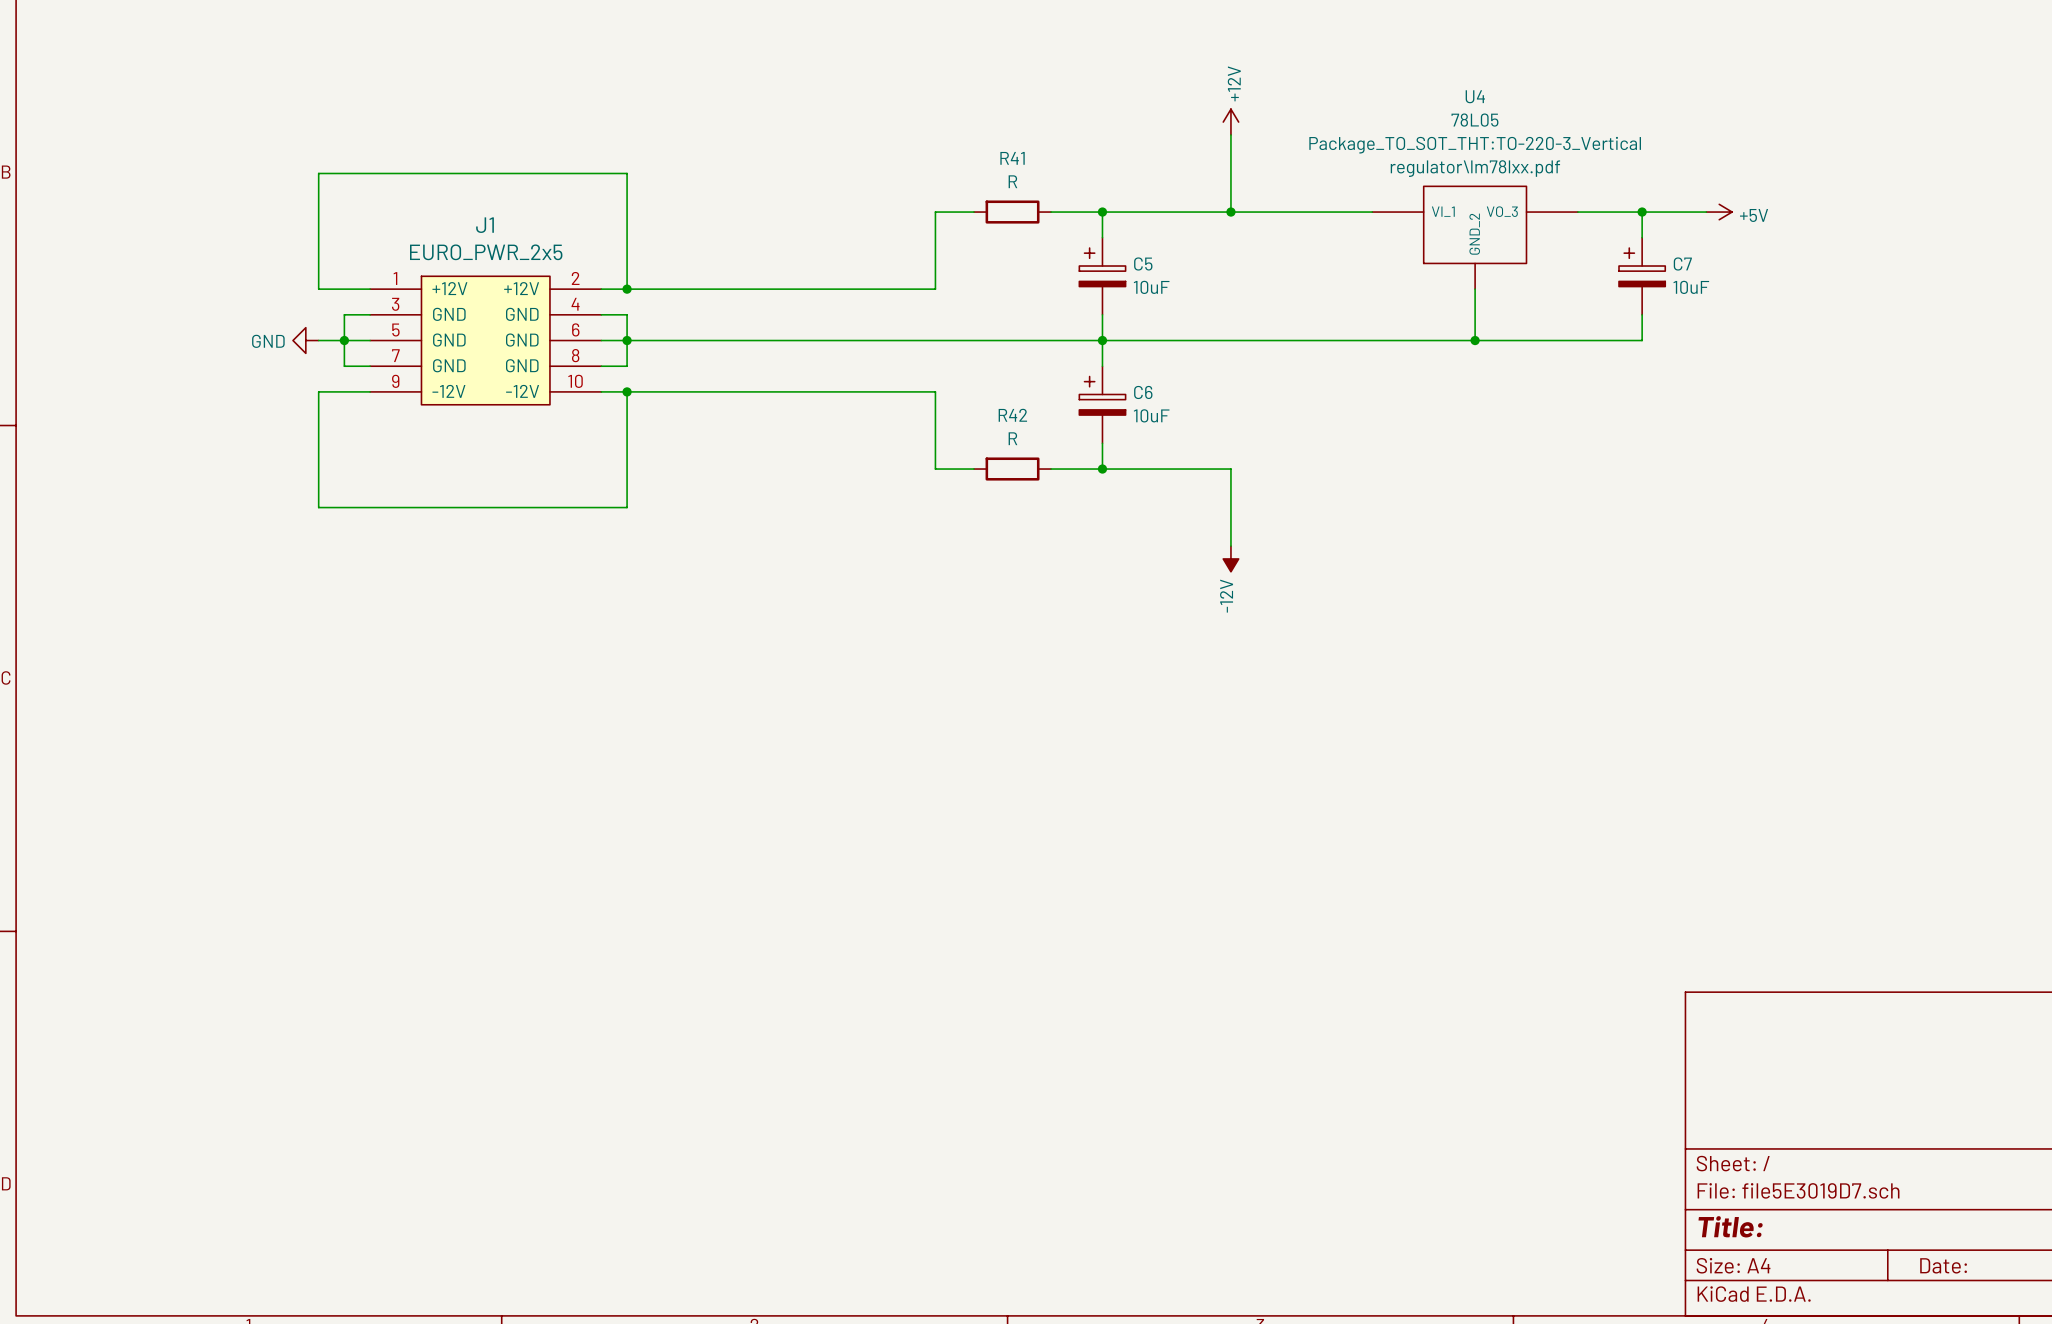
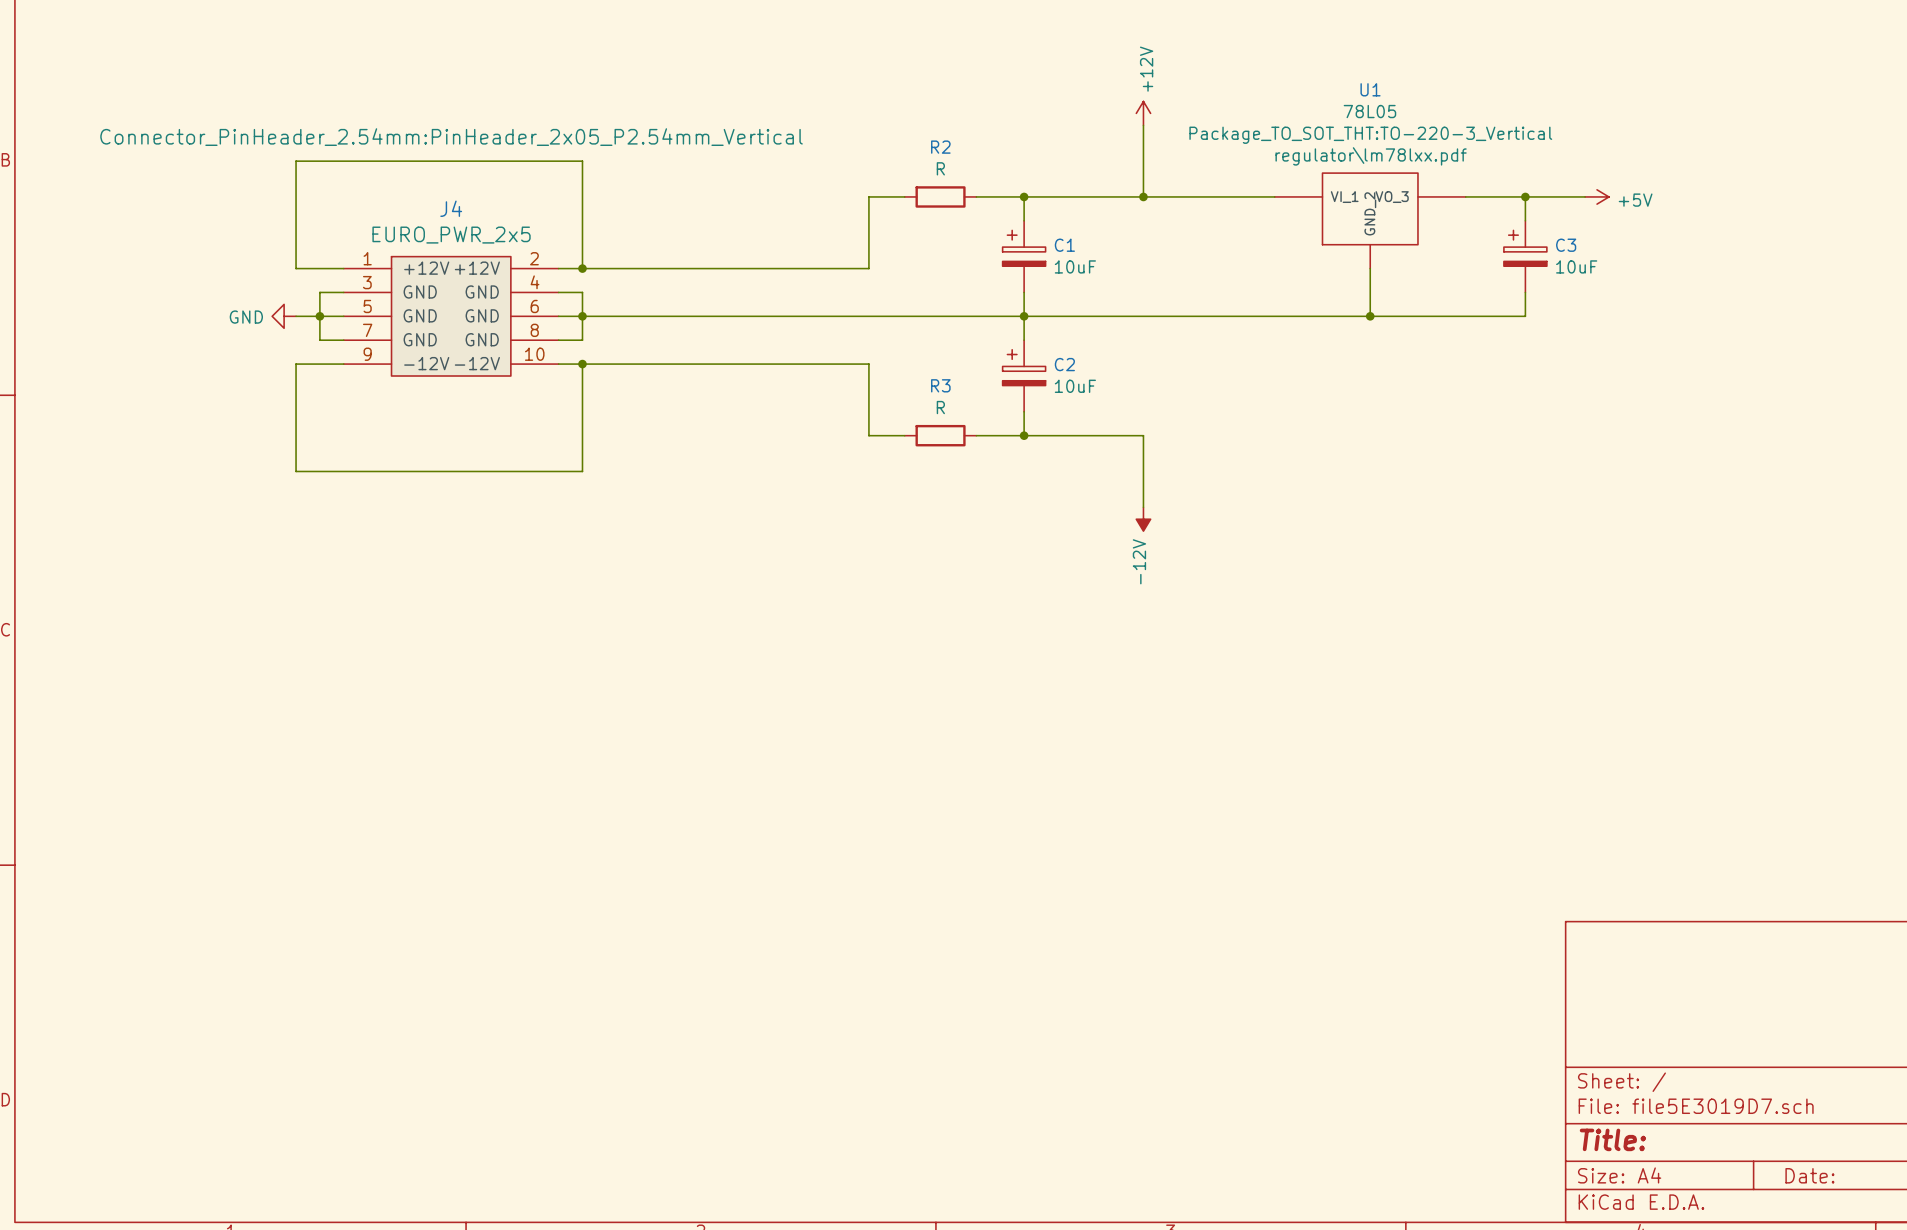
U4 name: U4 (1475, 96) -> U1 (1370, 89)
J1 text: none -> Connector_PinHeader_2.54mm:PinHeader_2x05_P2.54mm_Vertical (451, 137)
R41 name: R41 (1012, 158) -> R2 (940, 147)
J1 name: J1 (485, 225) -> J4 (451, 208)
C5 name: C5 (1143, 263) -> C1 (1064, 245)
C7 name: C7 (1682, 263) -> C3 (1566, 245)
C6 name: C6 (1143, 392) -> C2 (1064, 364)
R42 name: R42 (1012, 415) -> R3 (940, 385)

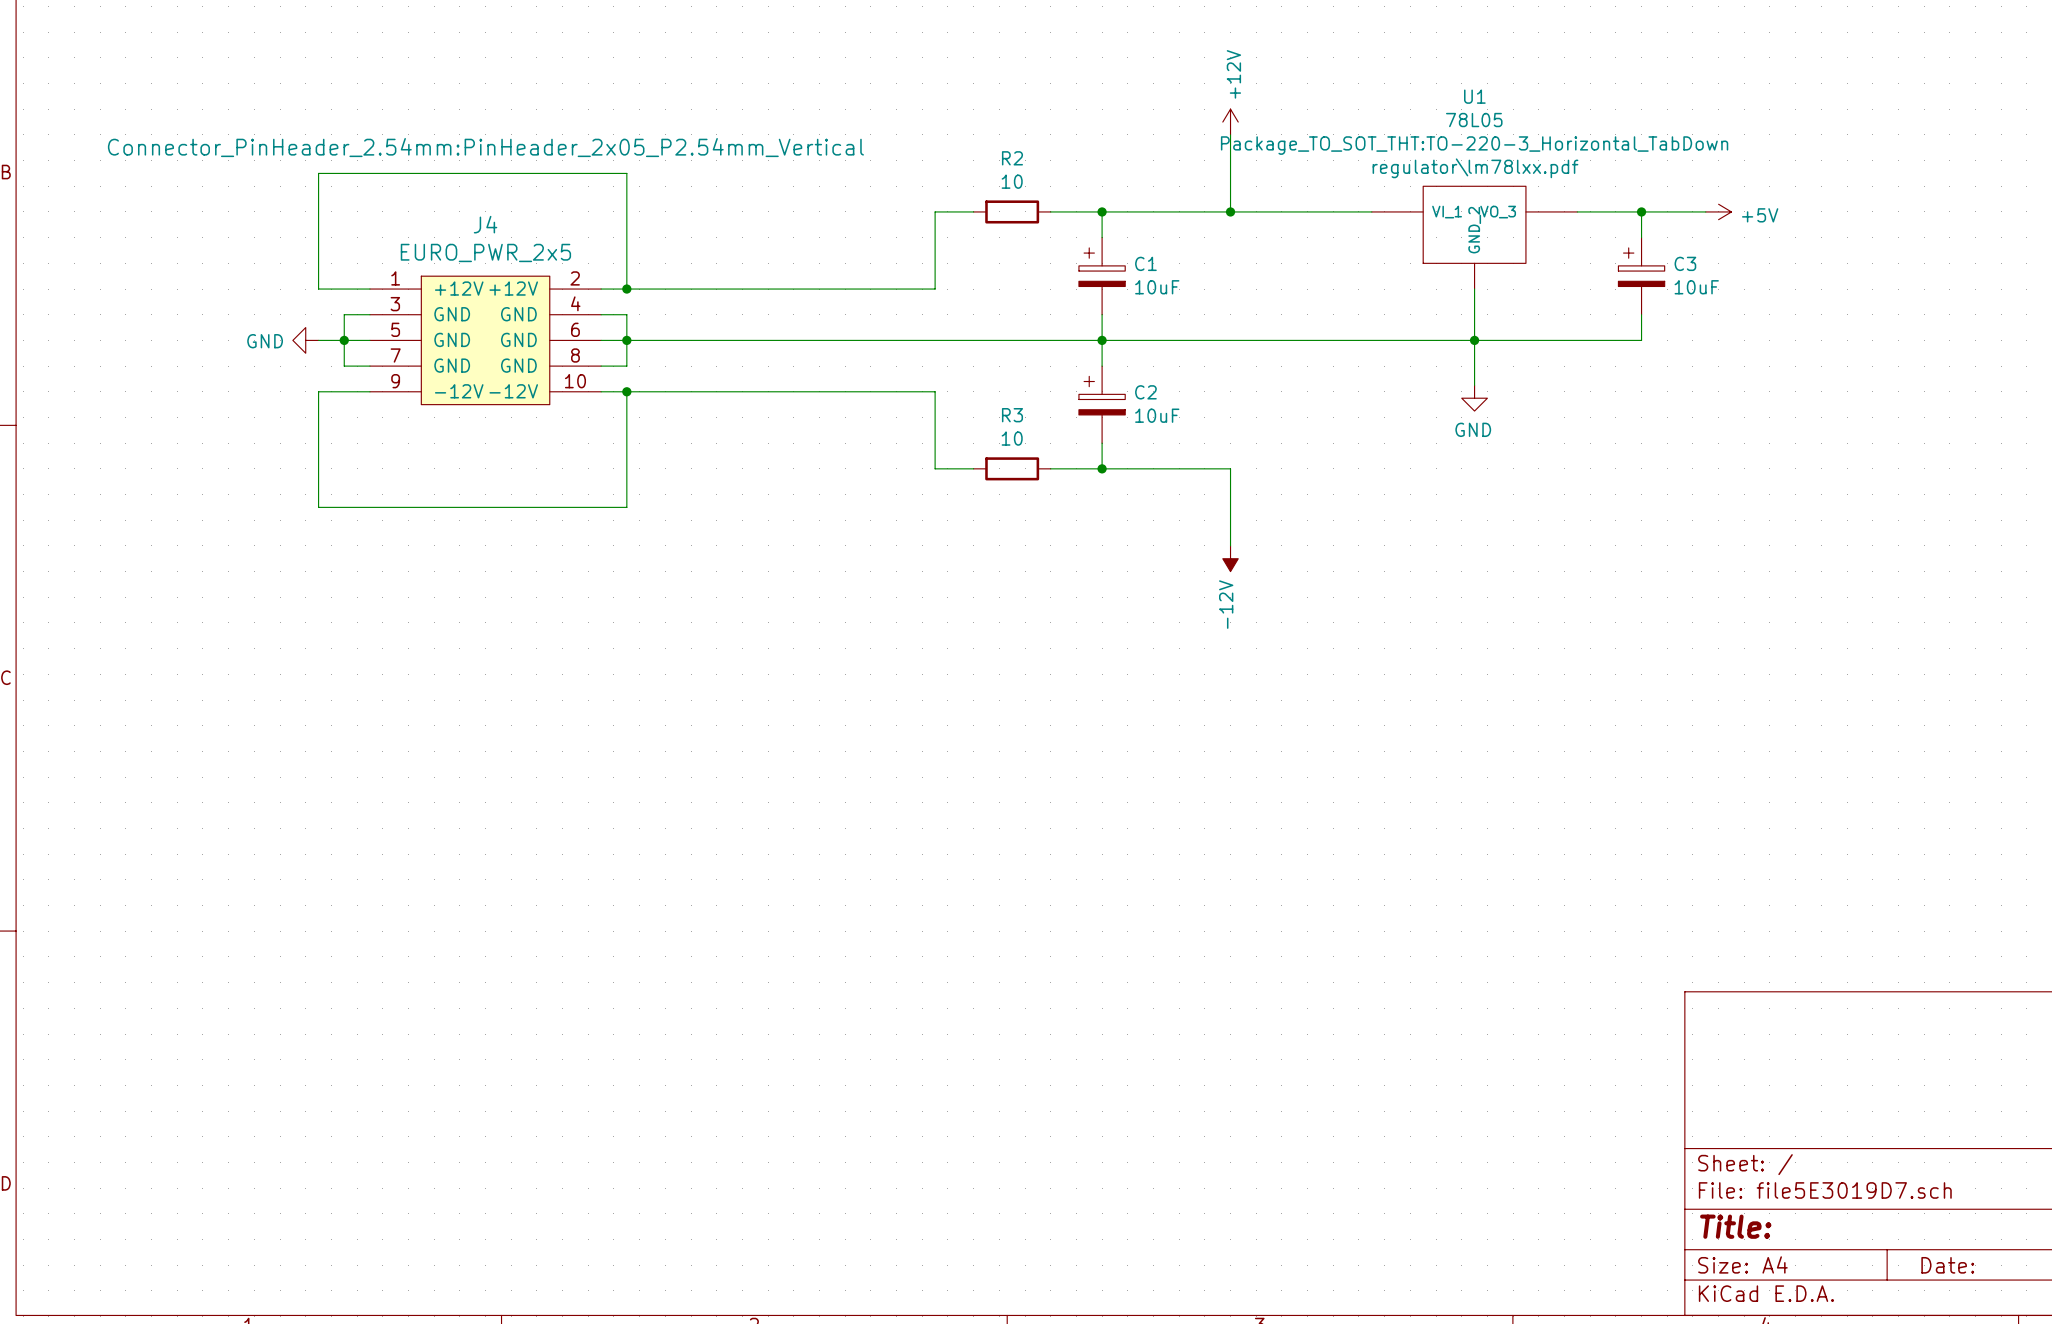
U1 text: Package_TO_SOT_THT:TO-220-3_Vertical (1370, 135) -> Package_TO_SOT_THT:TO-220-3_Horizontal_TabDown (1474, 145)
R2 value: R (940, 168) -> 10 (1012, 181)
wire: none -> (1474, 340) (1474, 385)
power symbol: none -> GND (1474, 398)
R3 value: R (940, 407) -> 10 (1012, 438)

